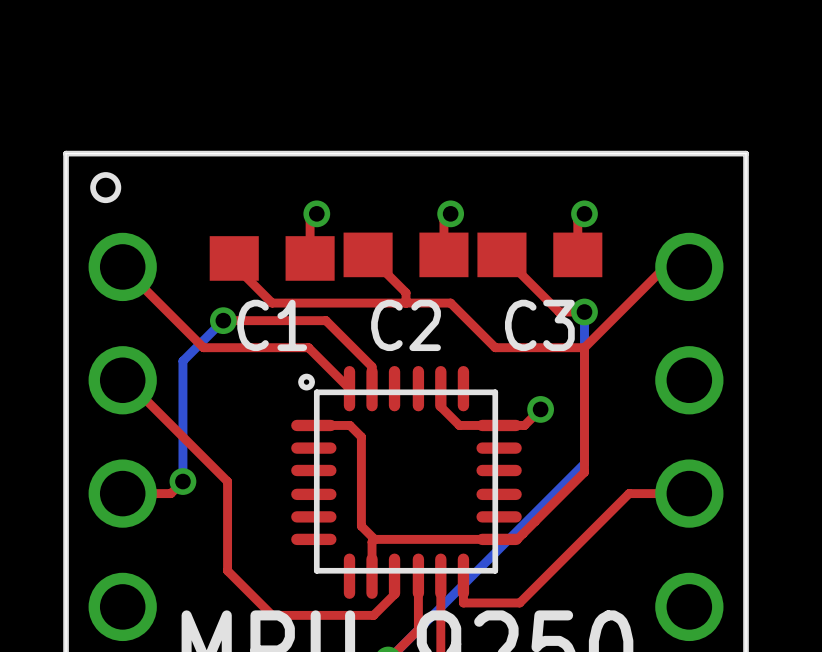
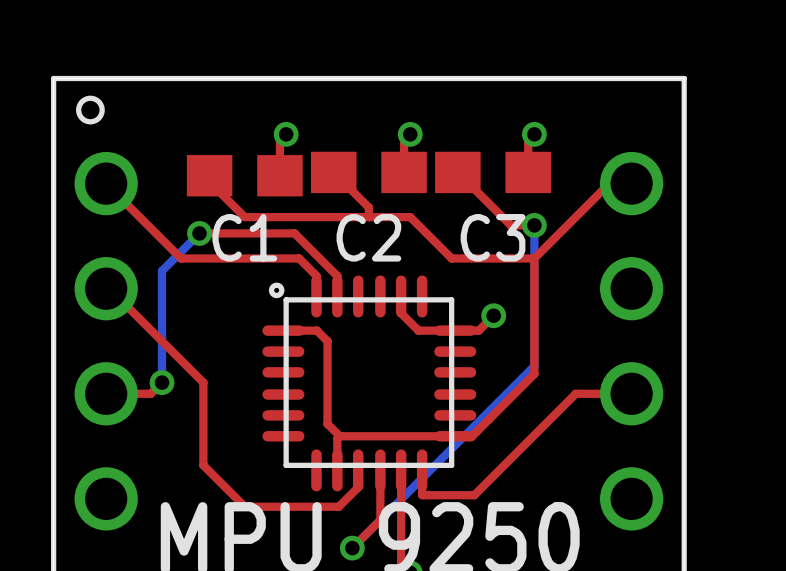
top track: (308, 347) (349, 388) -> (278, 258) (299, 258) (316, 275) (316, 296)

